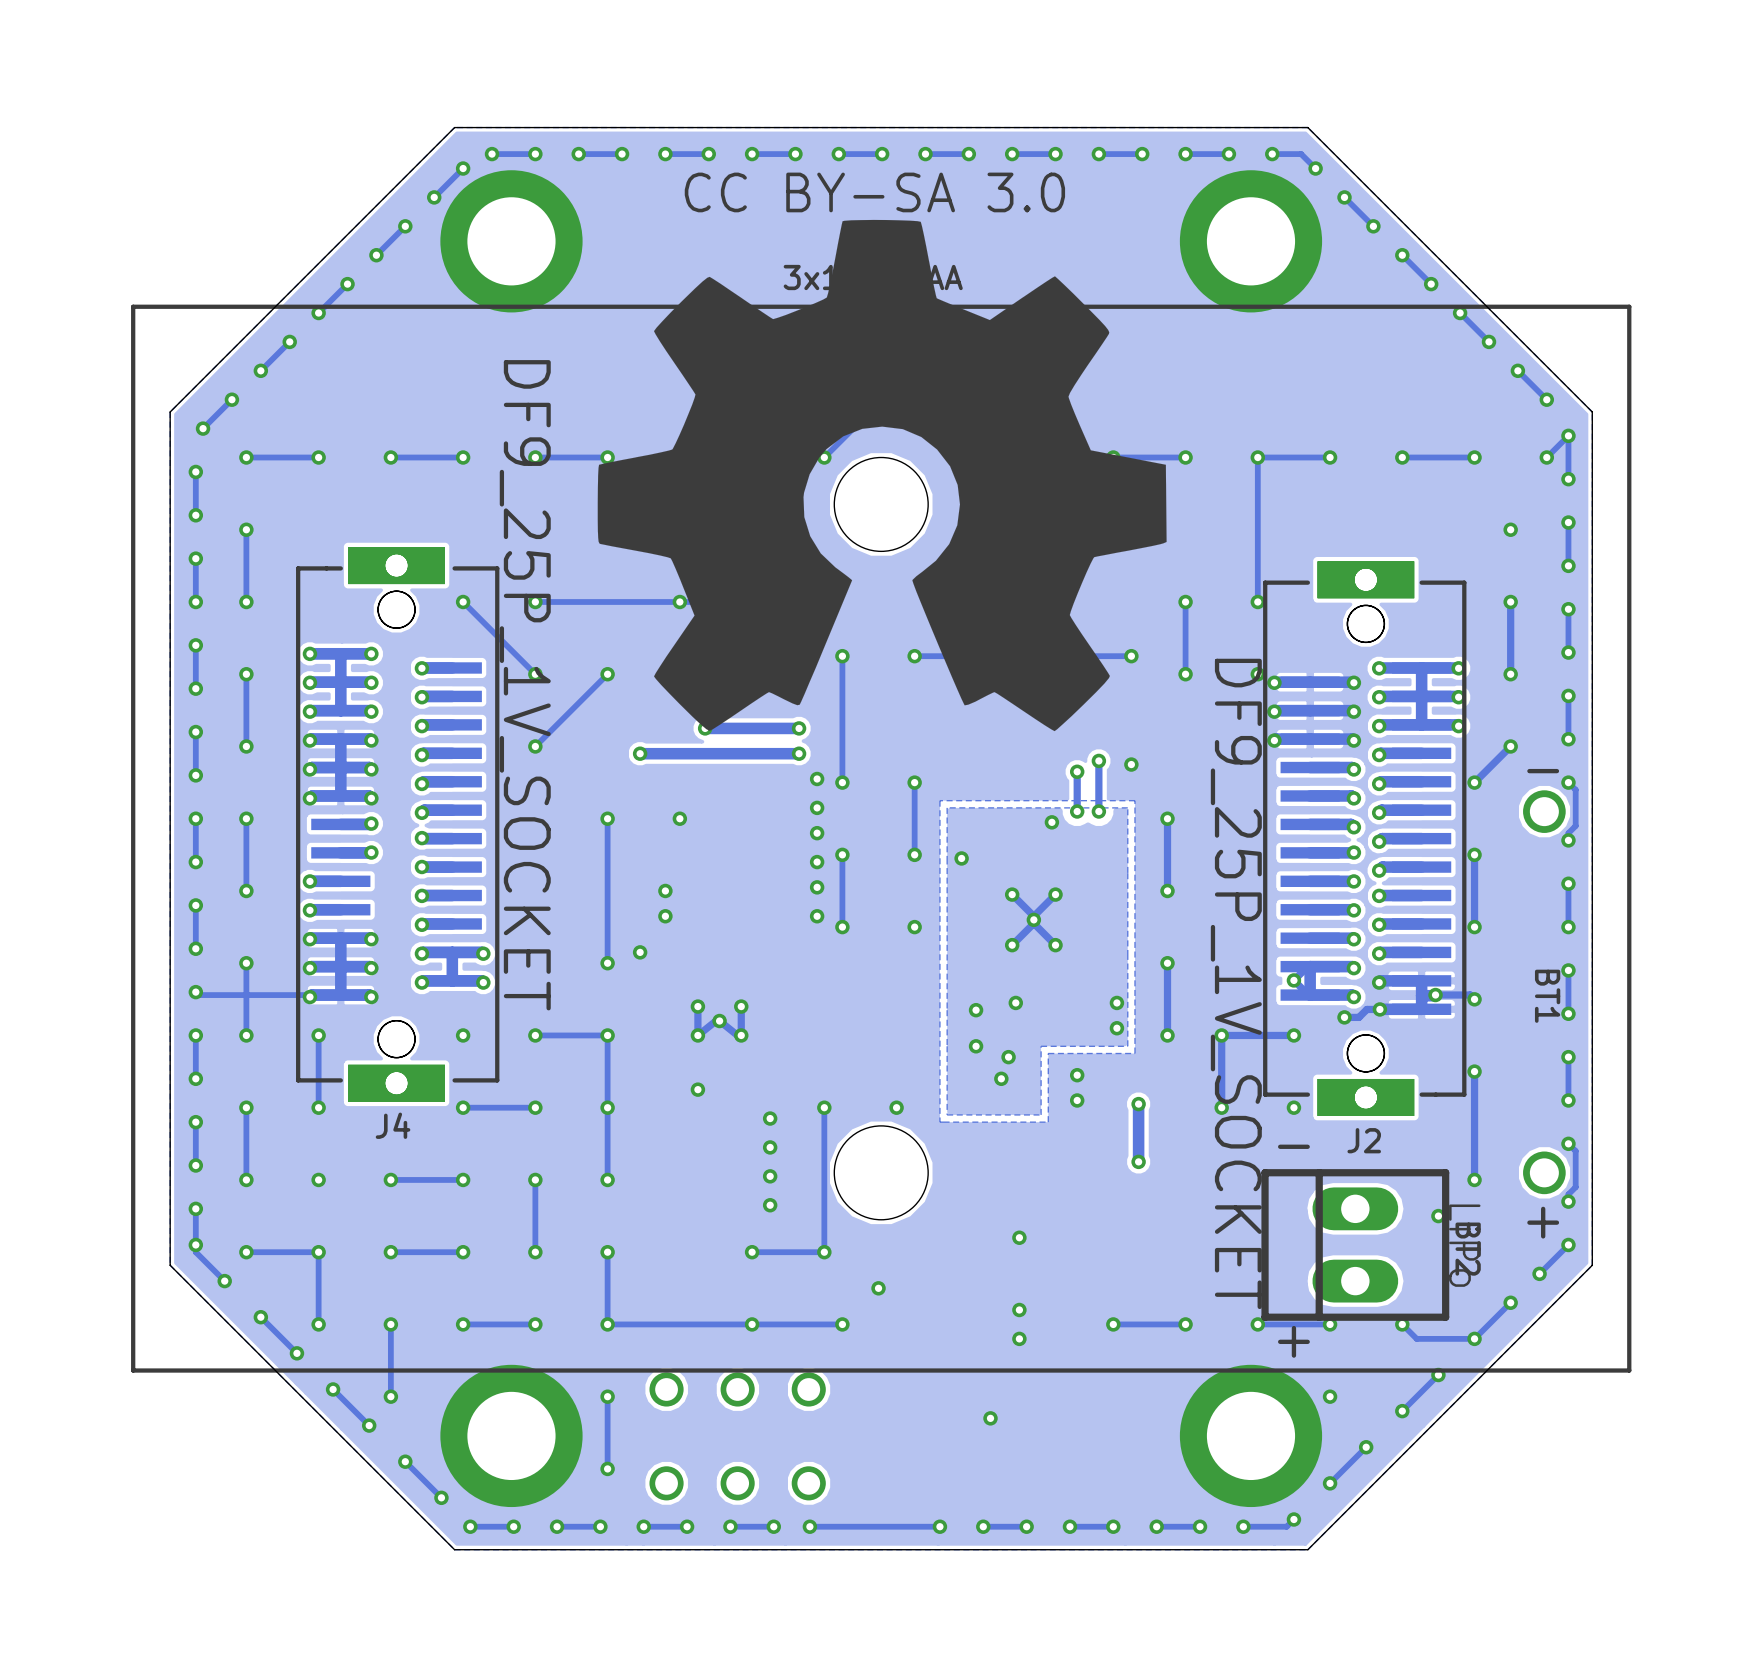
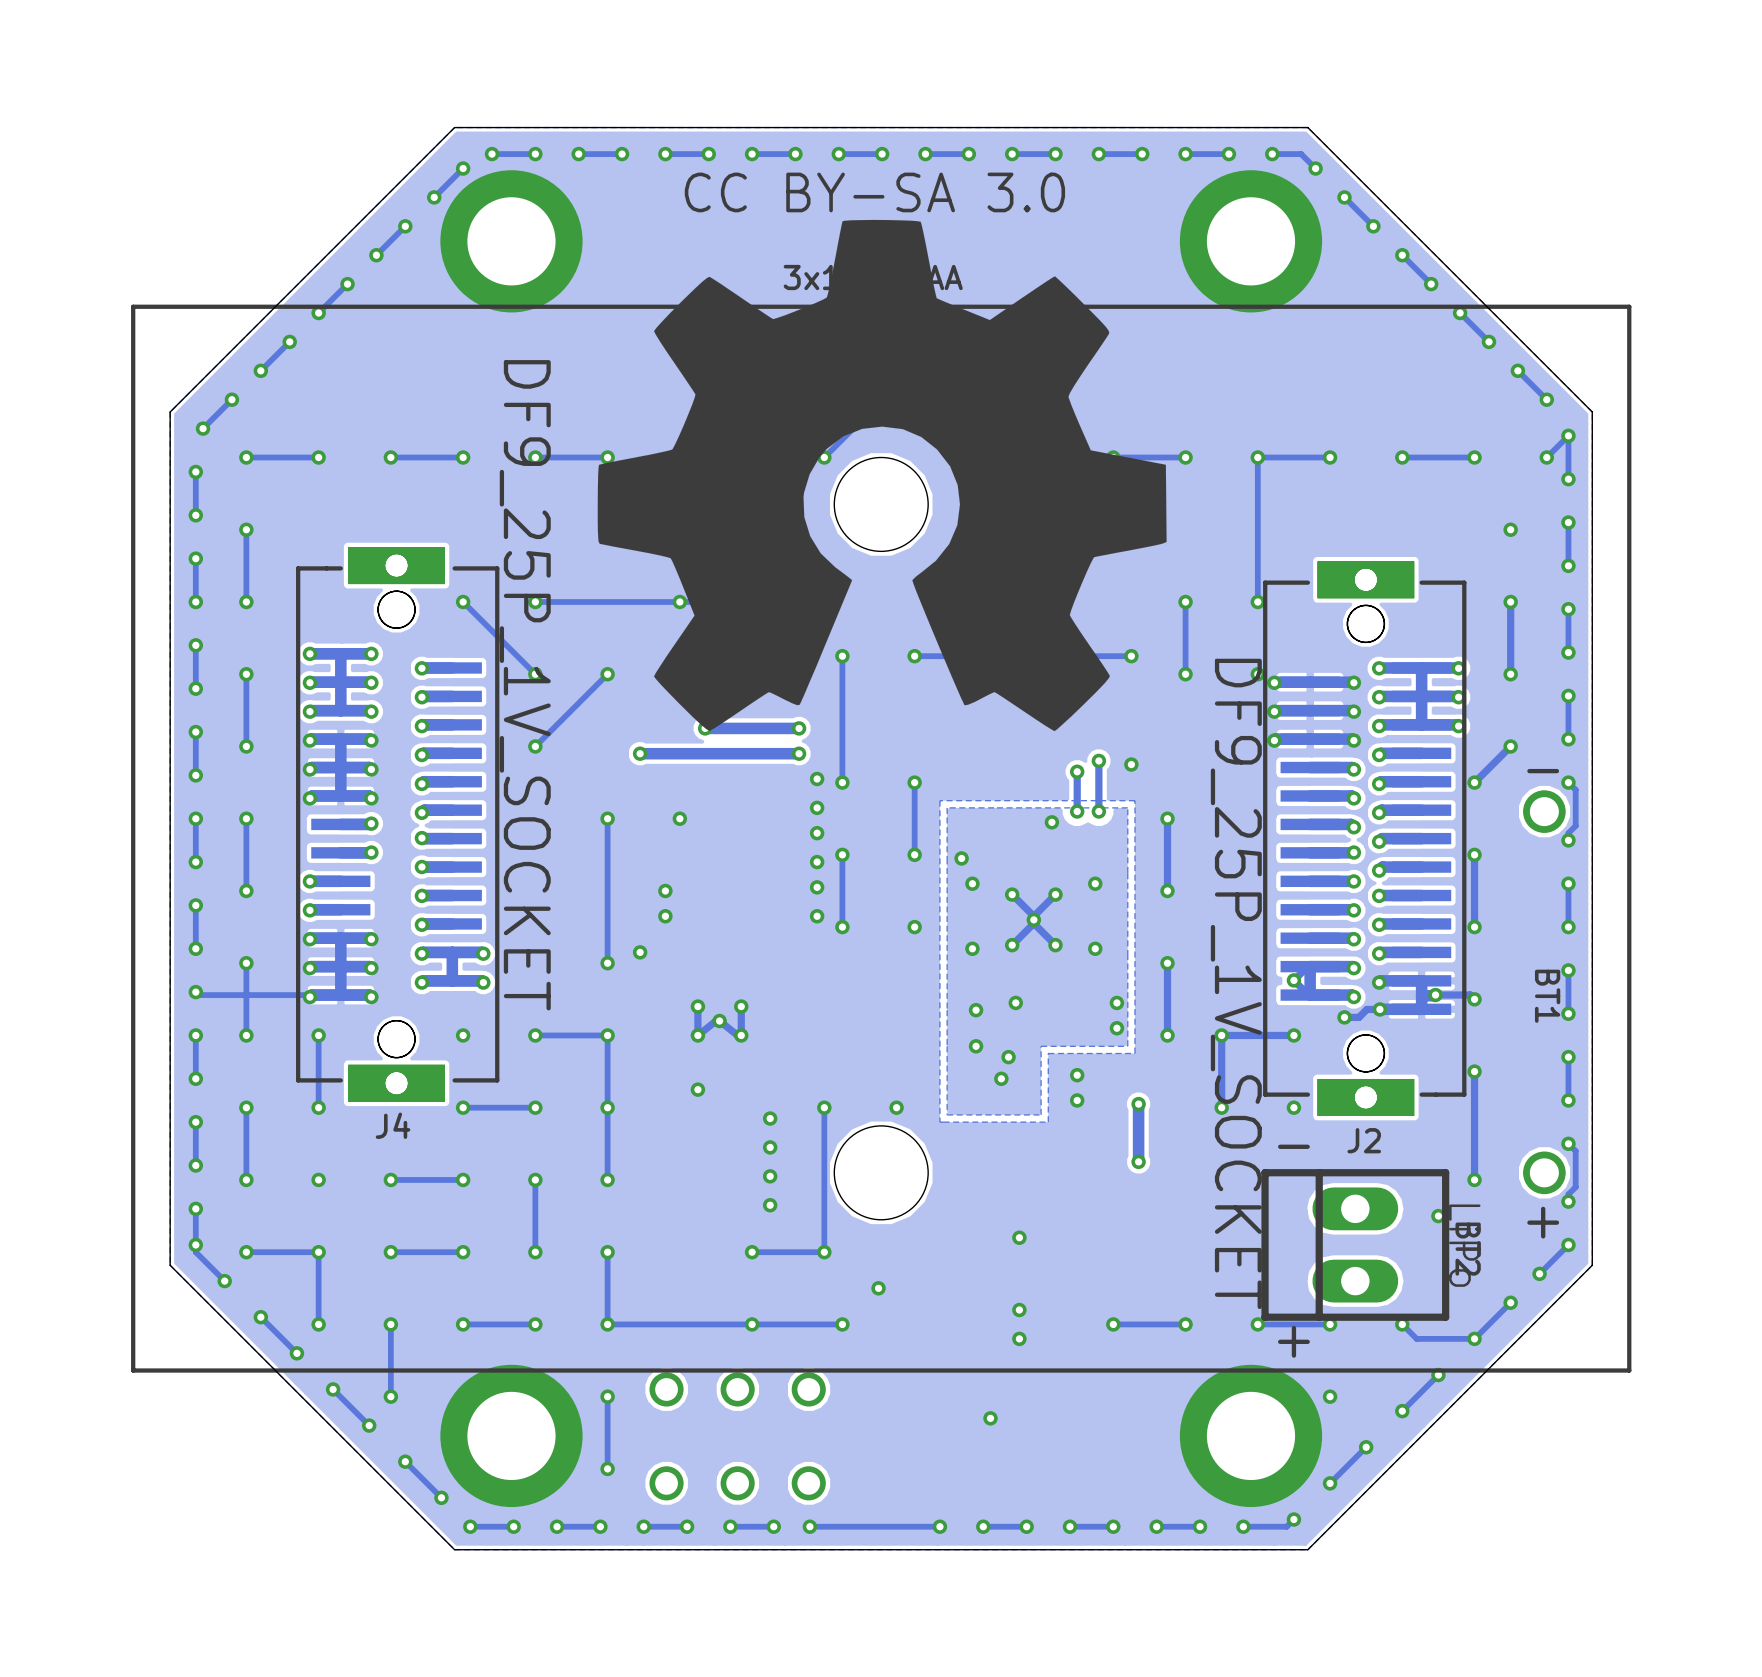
via: none -> (972, 883)
via: none -> (1095, 883)
via: none -> (972, 948)
via: none -> (1095, 948)

